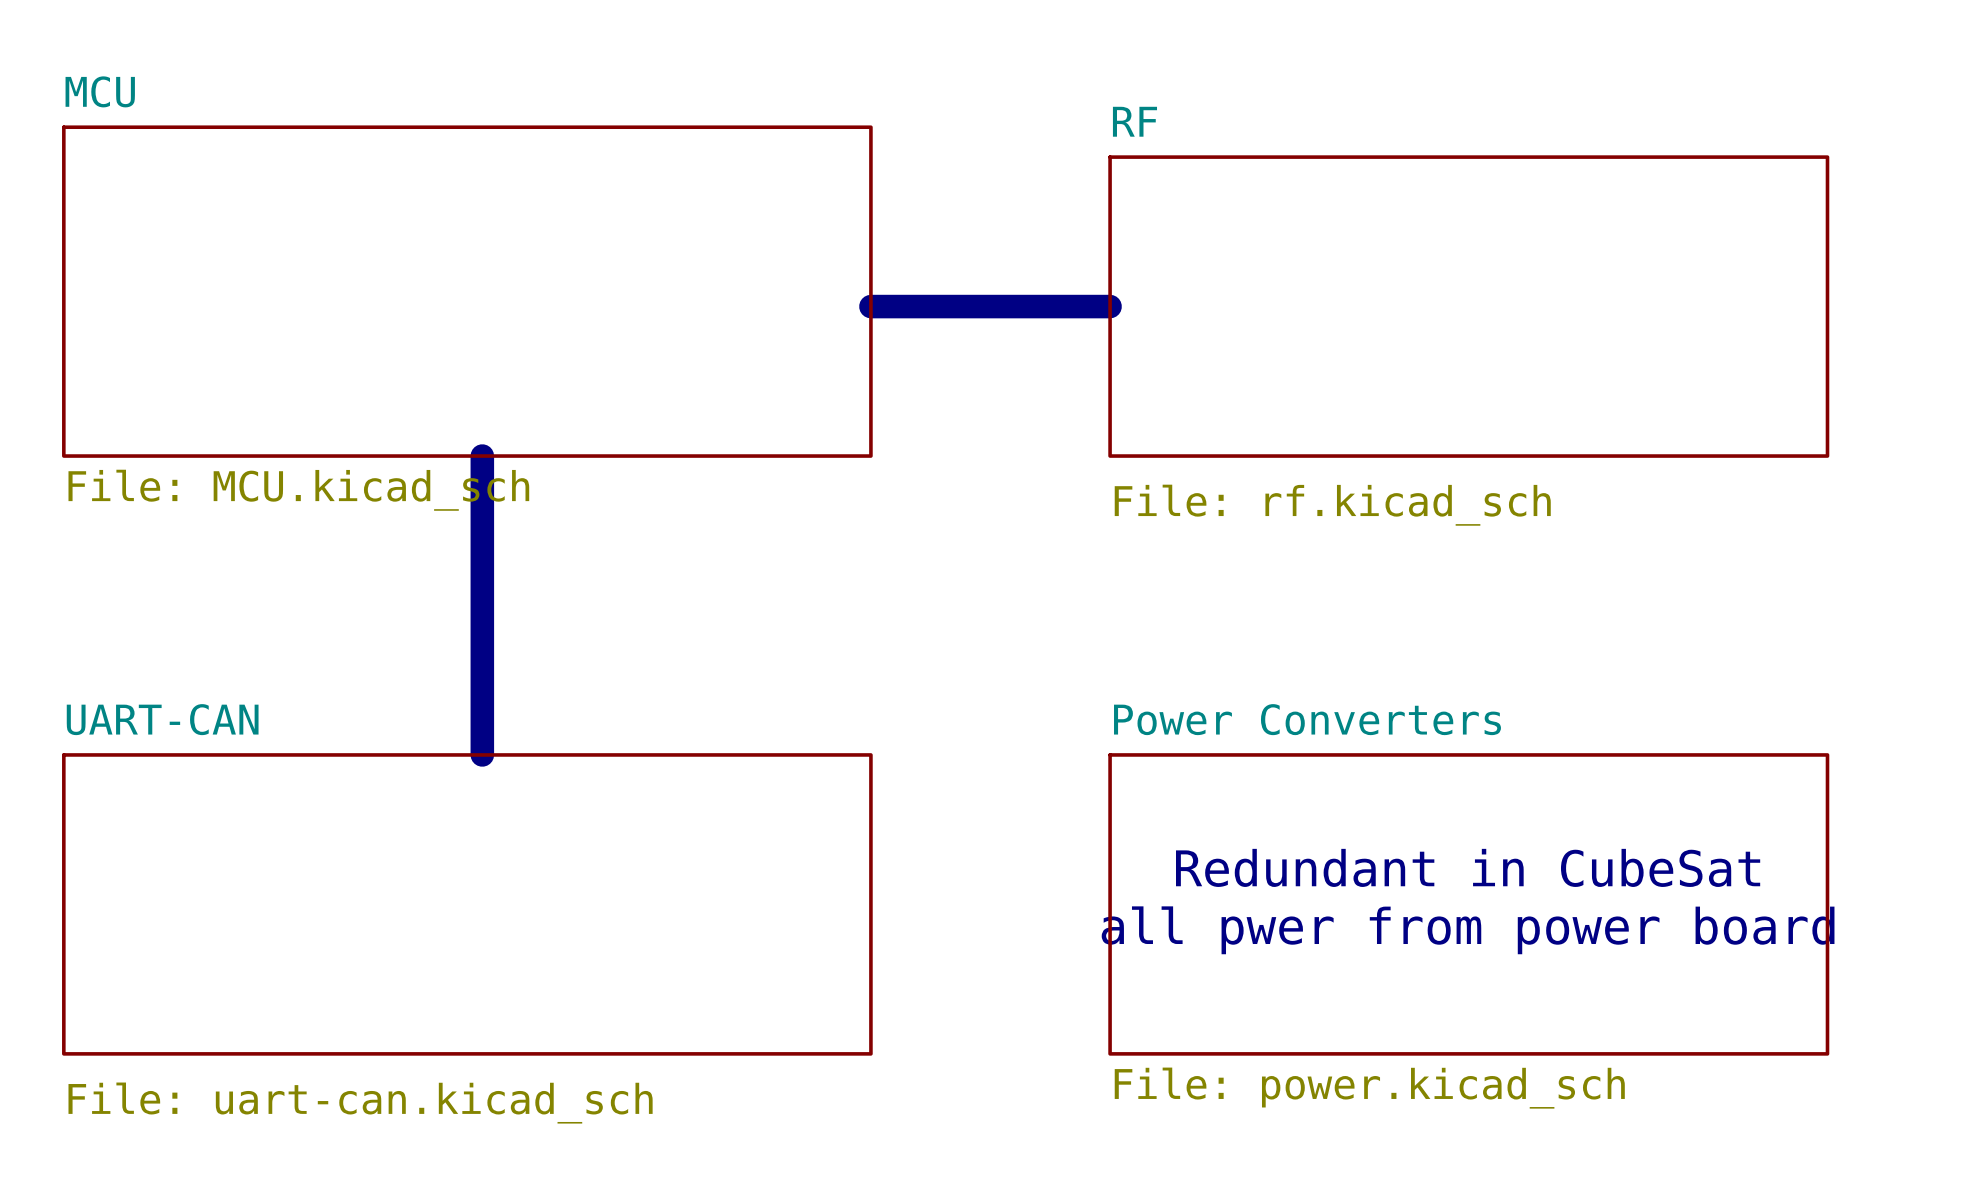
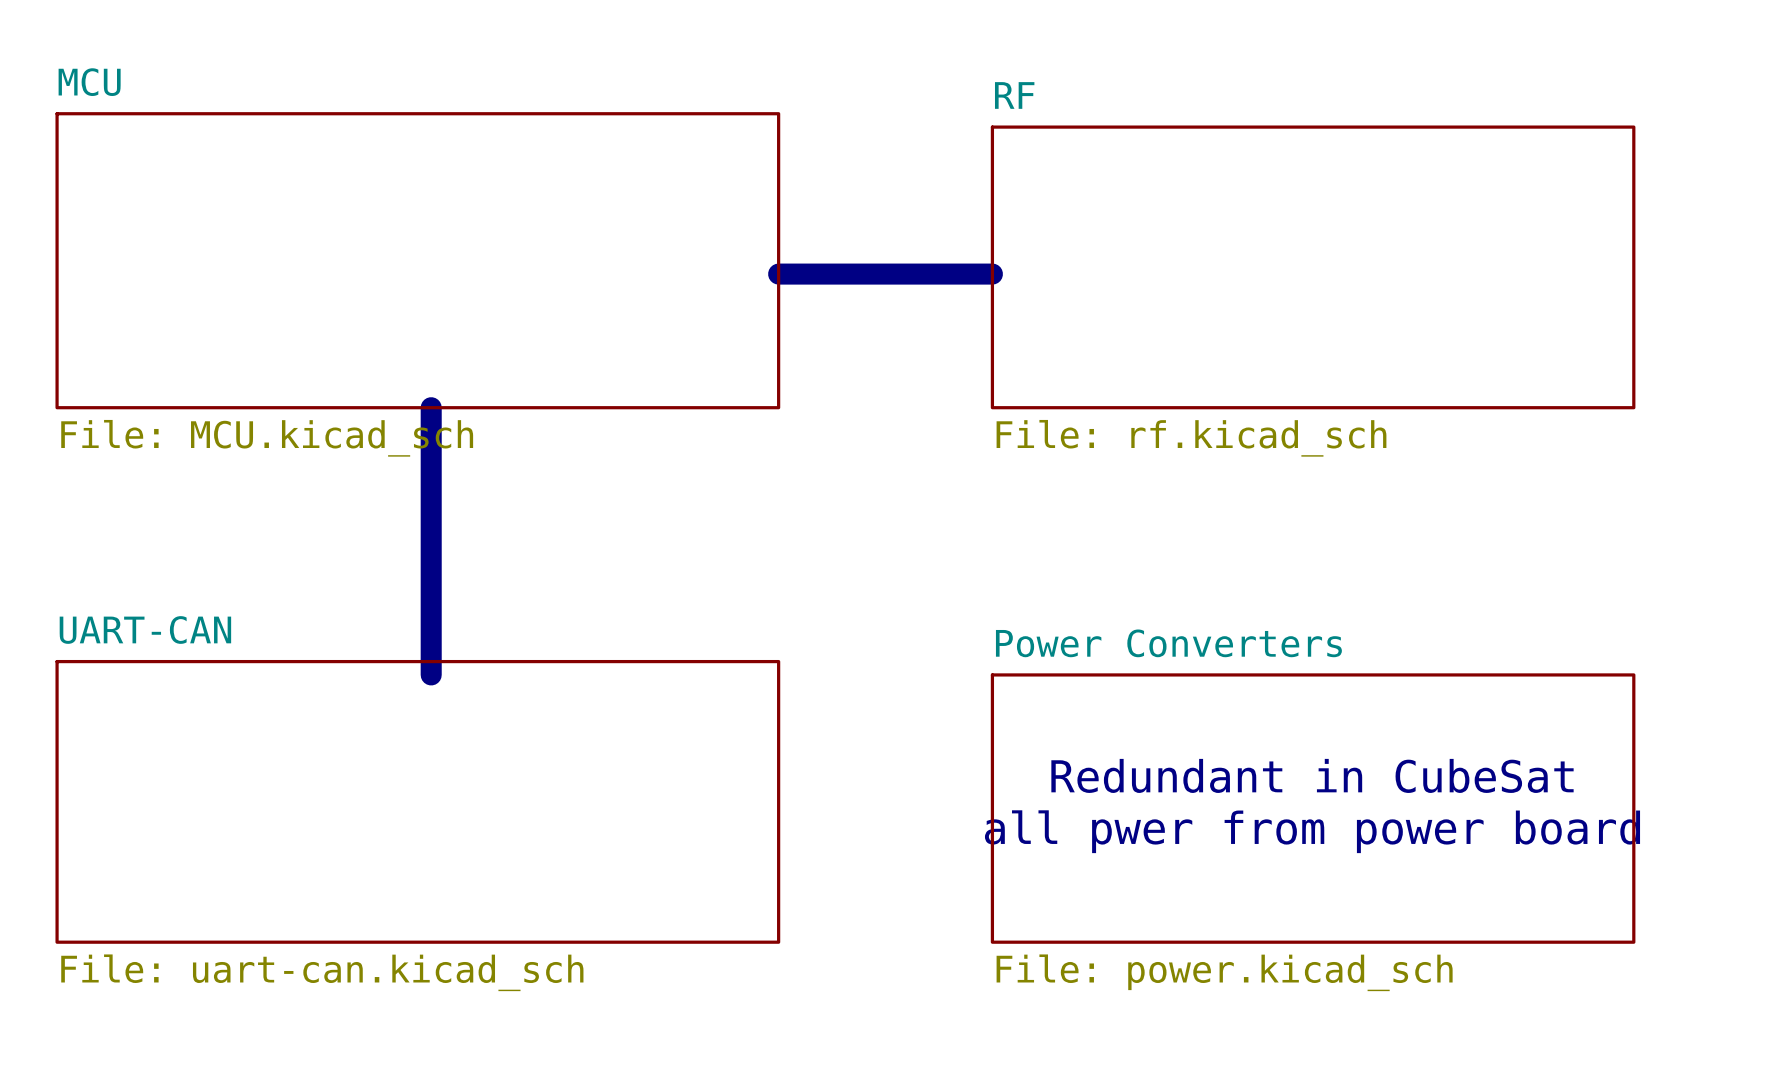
sheet RF name position: RF (1134, 121) -> RF (1014, 95)
sheet RF shape: [1108, 155, 1830, 458] -> [990, 125, 1636, 410]
sheet RF value position: File: rf.kicad_sch (1332, 505) -> File: rf.kicad_sch (1191, 438)
sheet UART-CAN name position: UART-CAN (162, 719) -> UART-CAN (145, 629)
sheet UART-CAN shape: [62, 753, 873, 1056] -> [55, 659, 781, 944]
sheet UART-CAN value position: File: uart-can.kicad_sch (360, 1103) -> File: uart-can.kicad_sch (322, 972)

